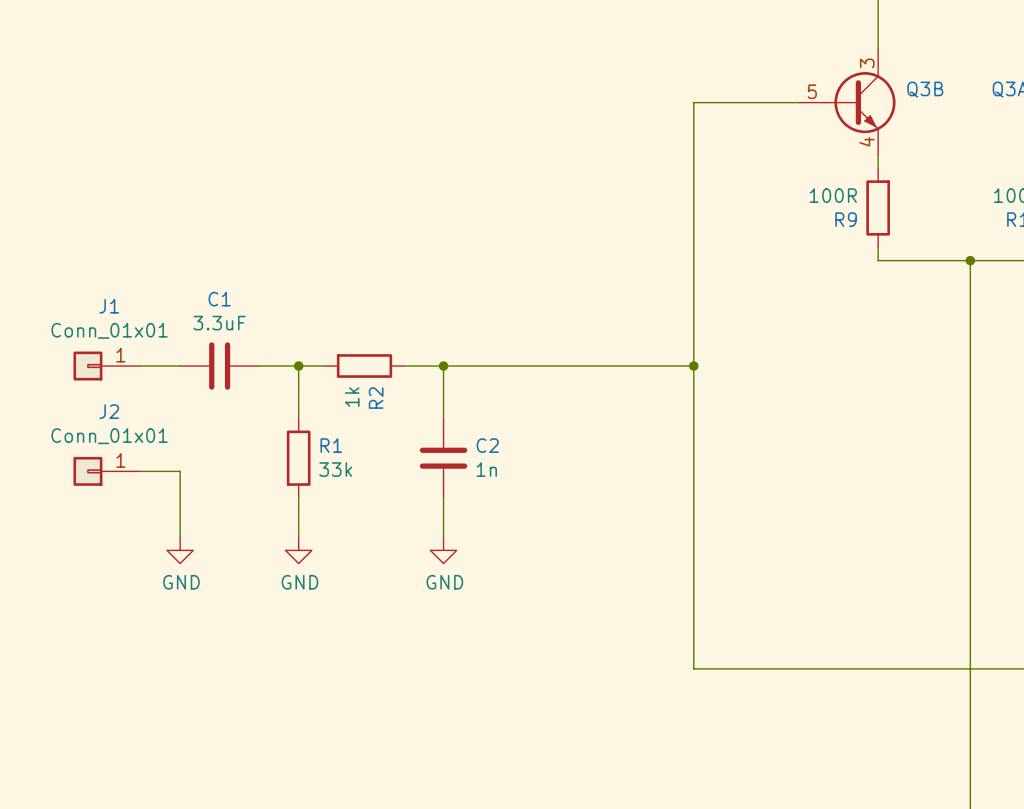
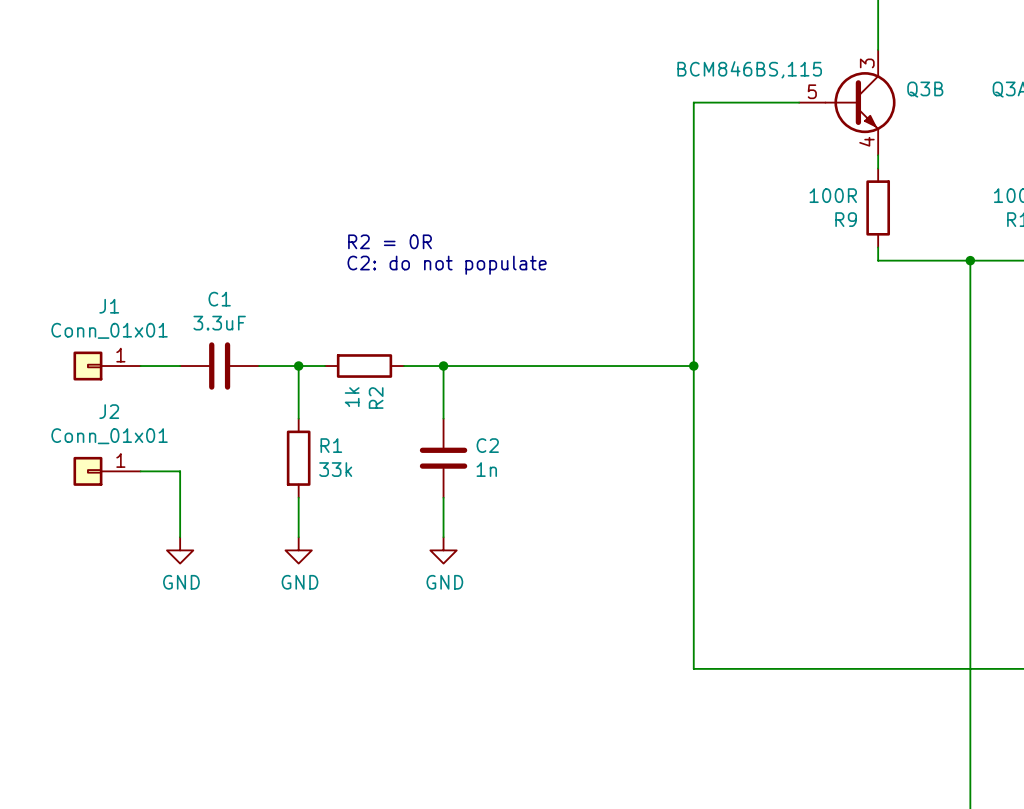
Q3B value: none -> BCM846BS,115 (749, 69)
text: none -> R2 = 0R (390, 241)
text: none -> C2: do not populate (447, 265)

